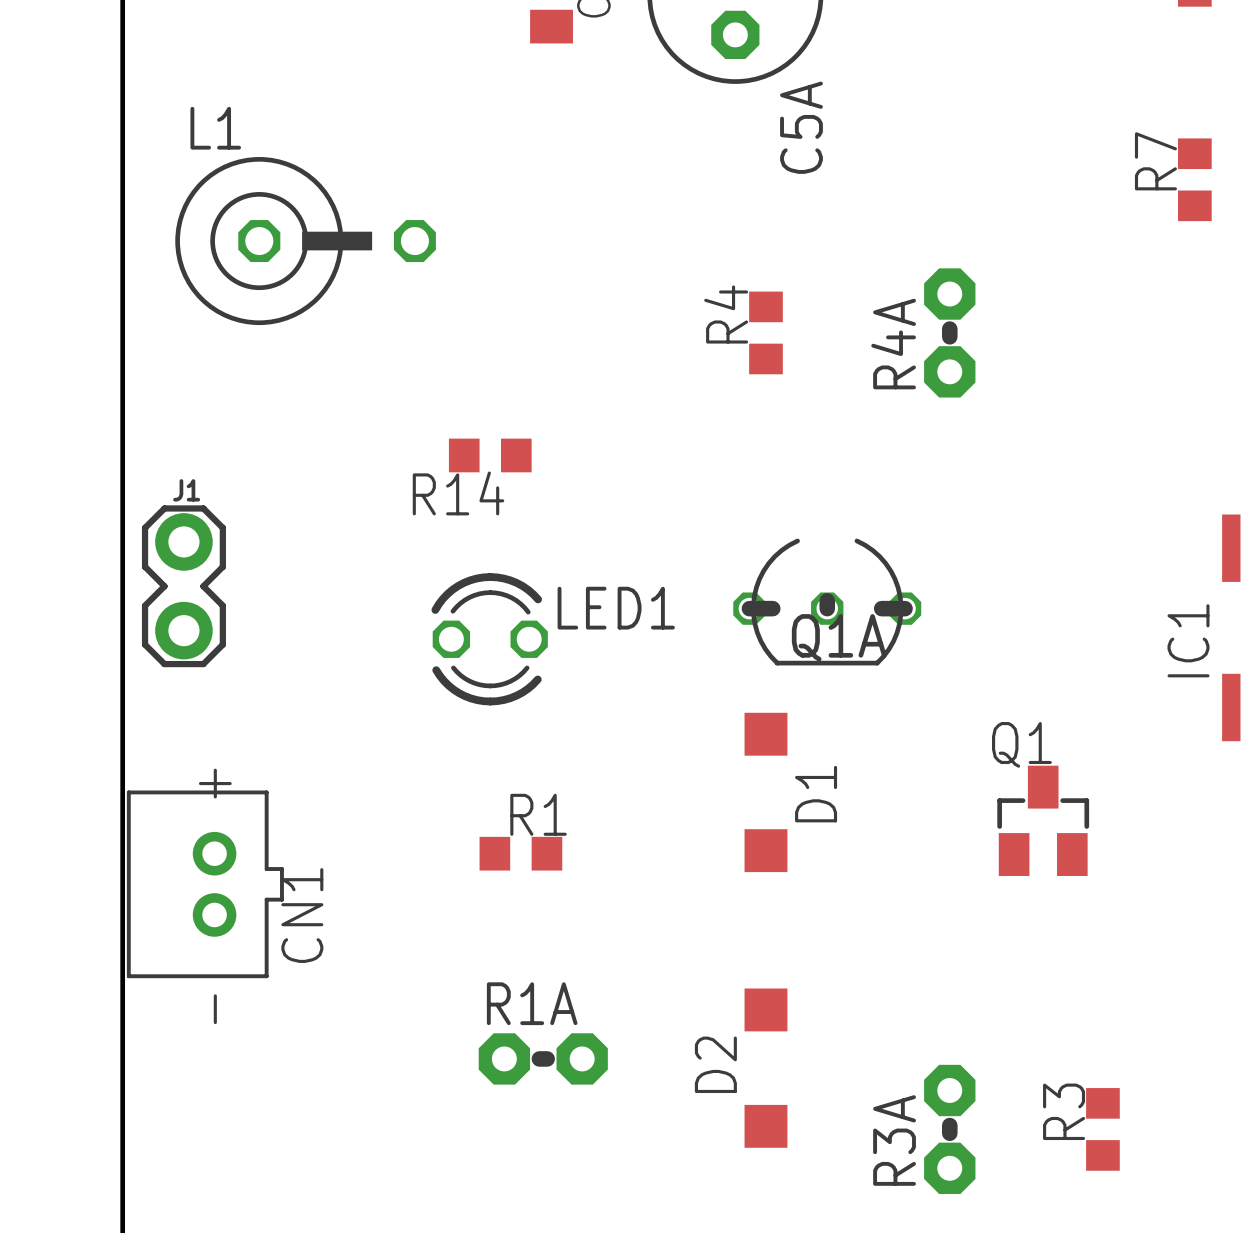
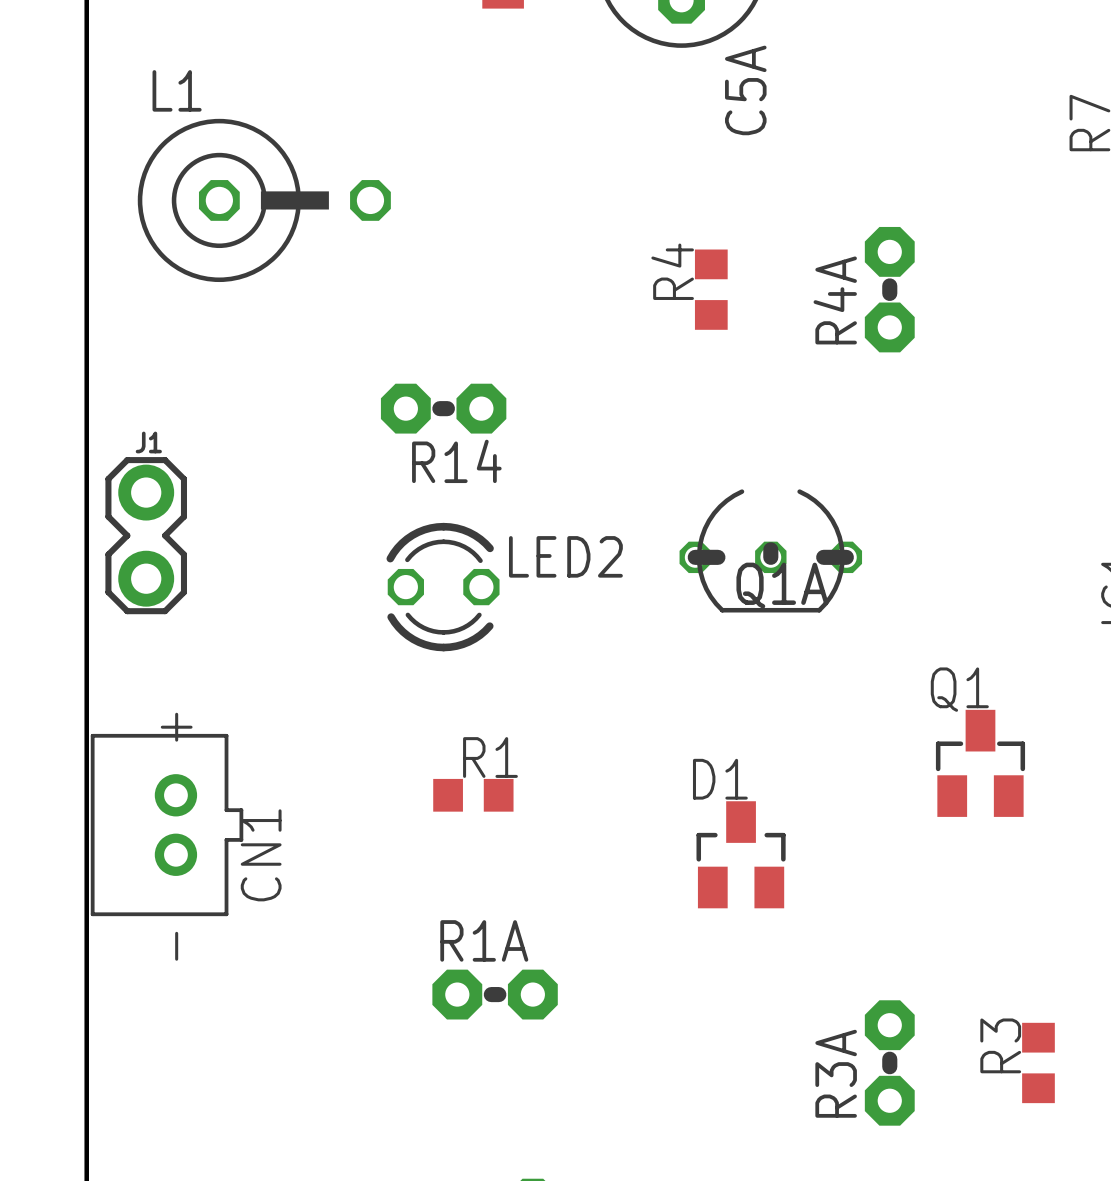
R14 footprint: [448, 438, 532, 473] -> [380, 383, 507, 434]
LED1 name: LED1 (616, 608) -> LED2 (565, 556)
D1 footprint: [744, 712, 788, 873] -> [696, 801, 786, 909]
D1 name position: D1 (816, 794) -> D1 (720, 779)
D2: (765, 1068) -> none

